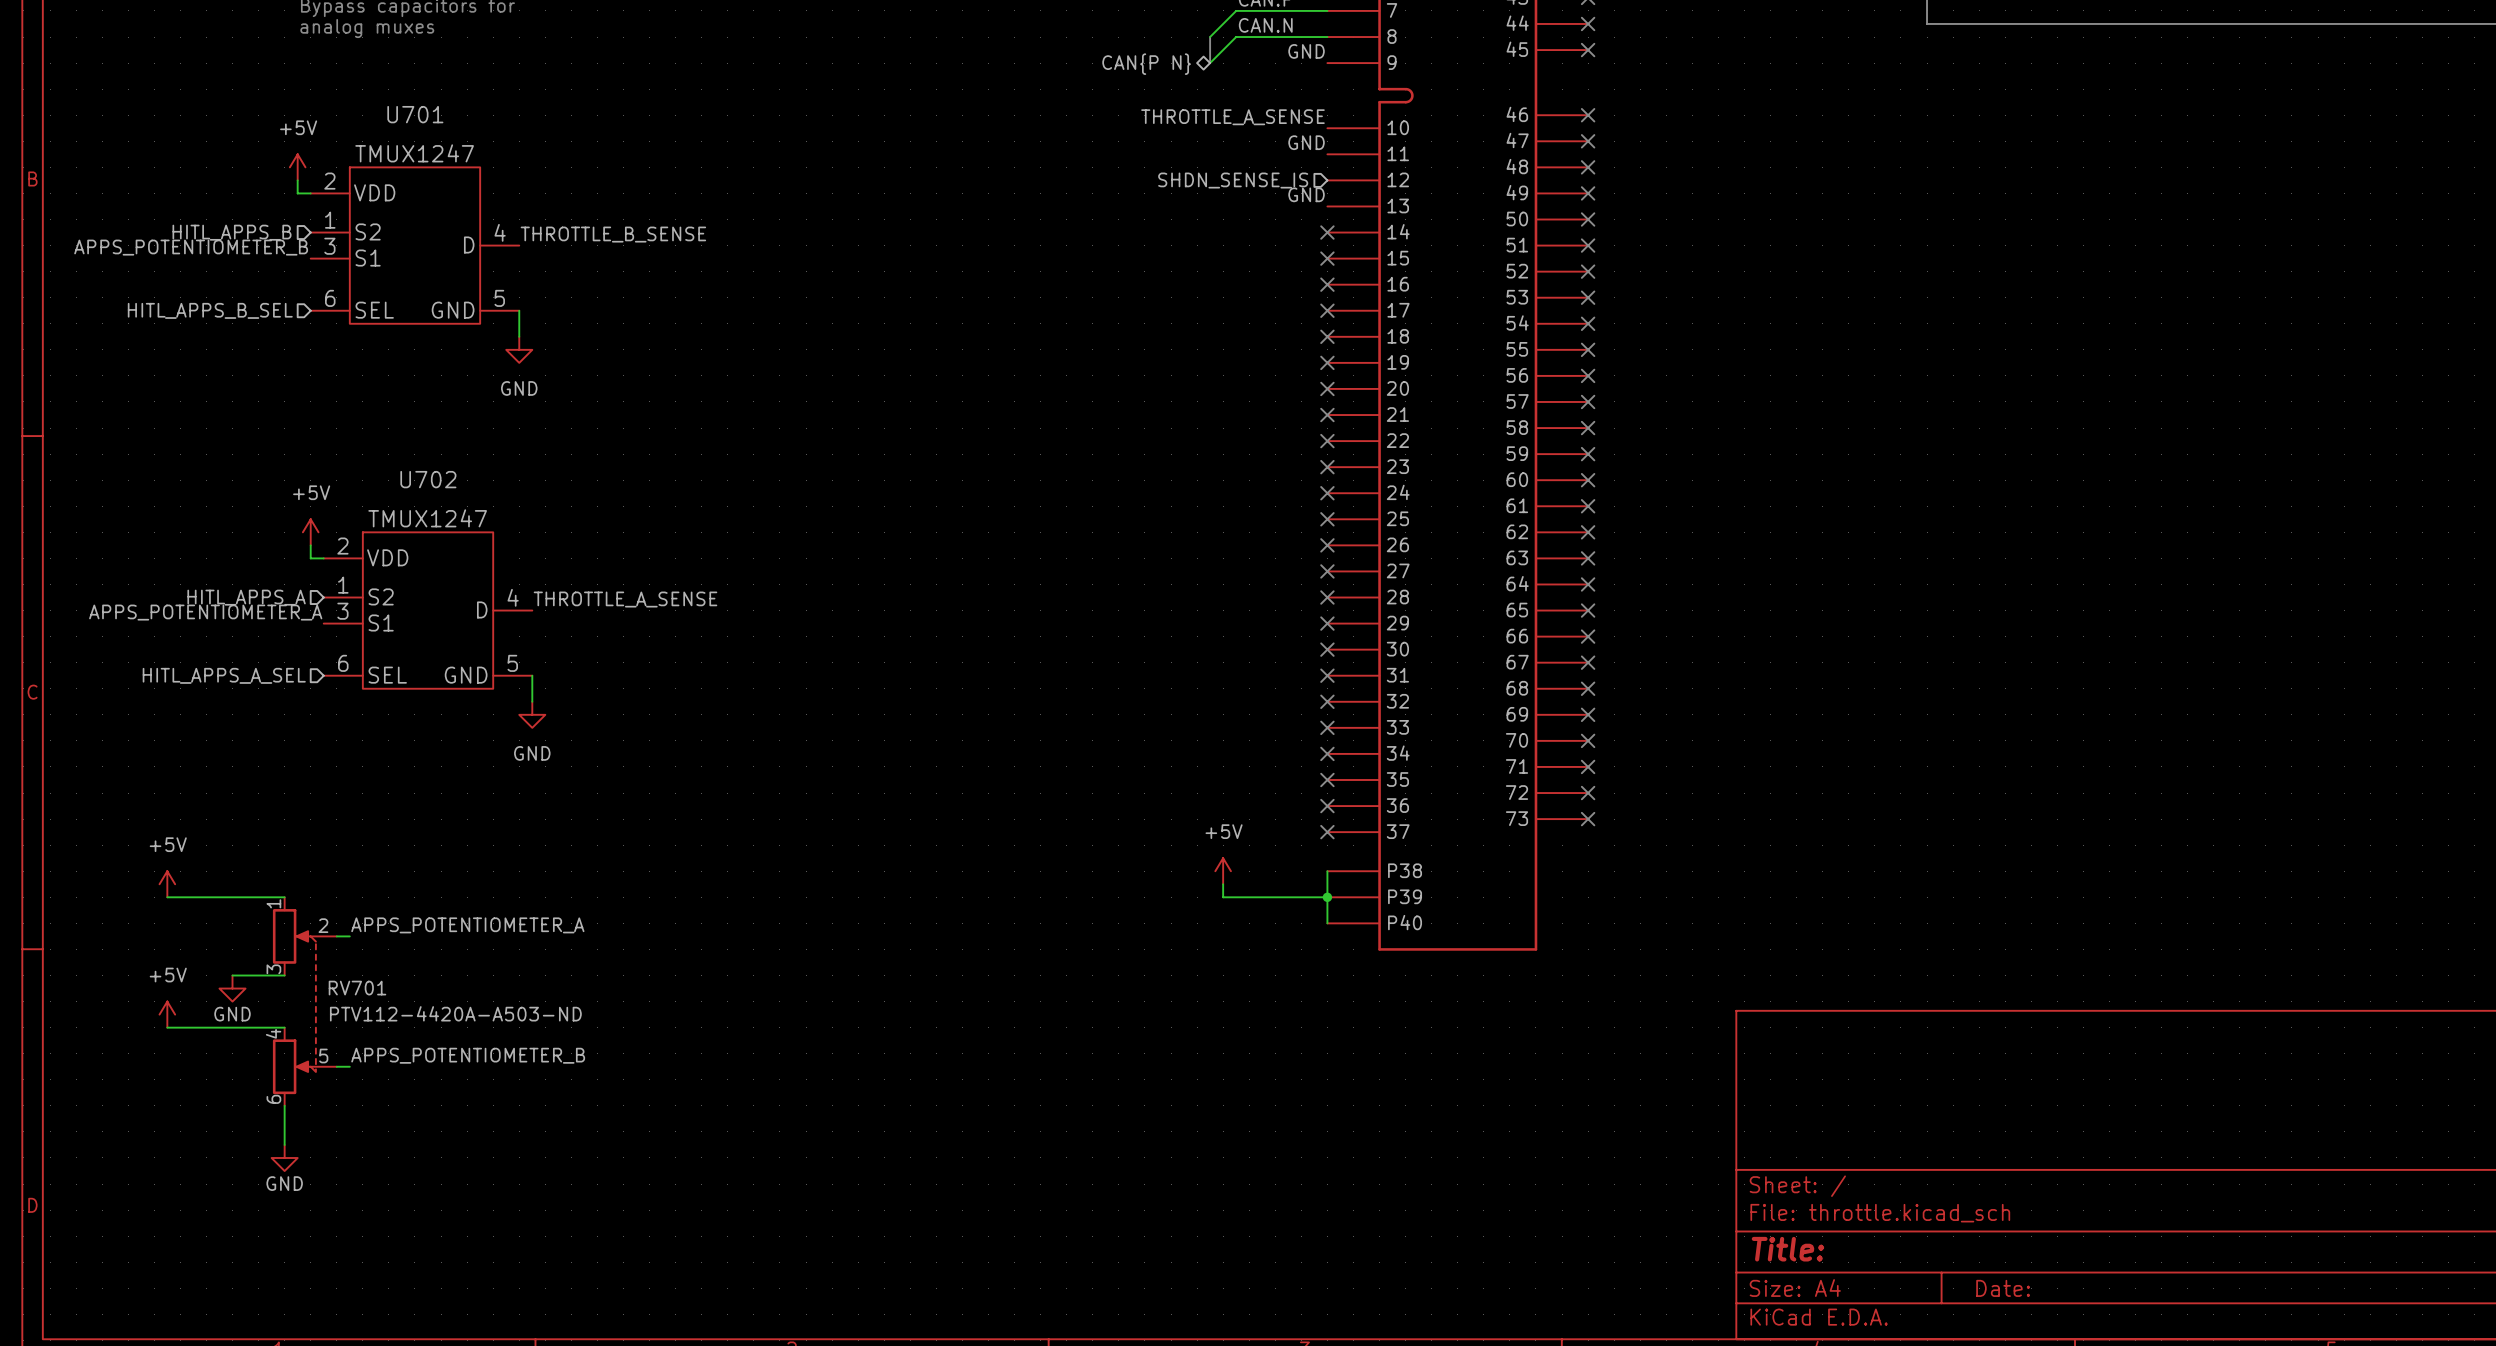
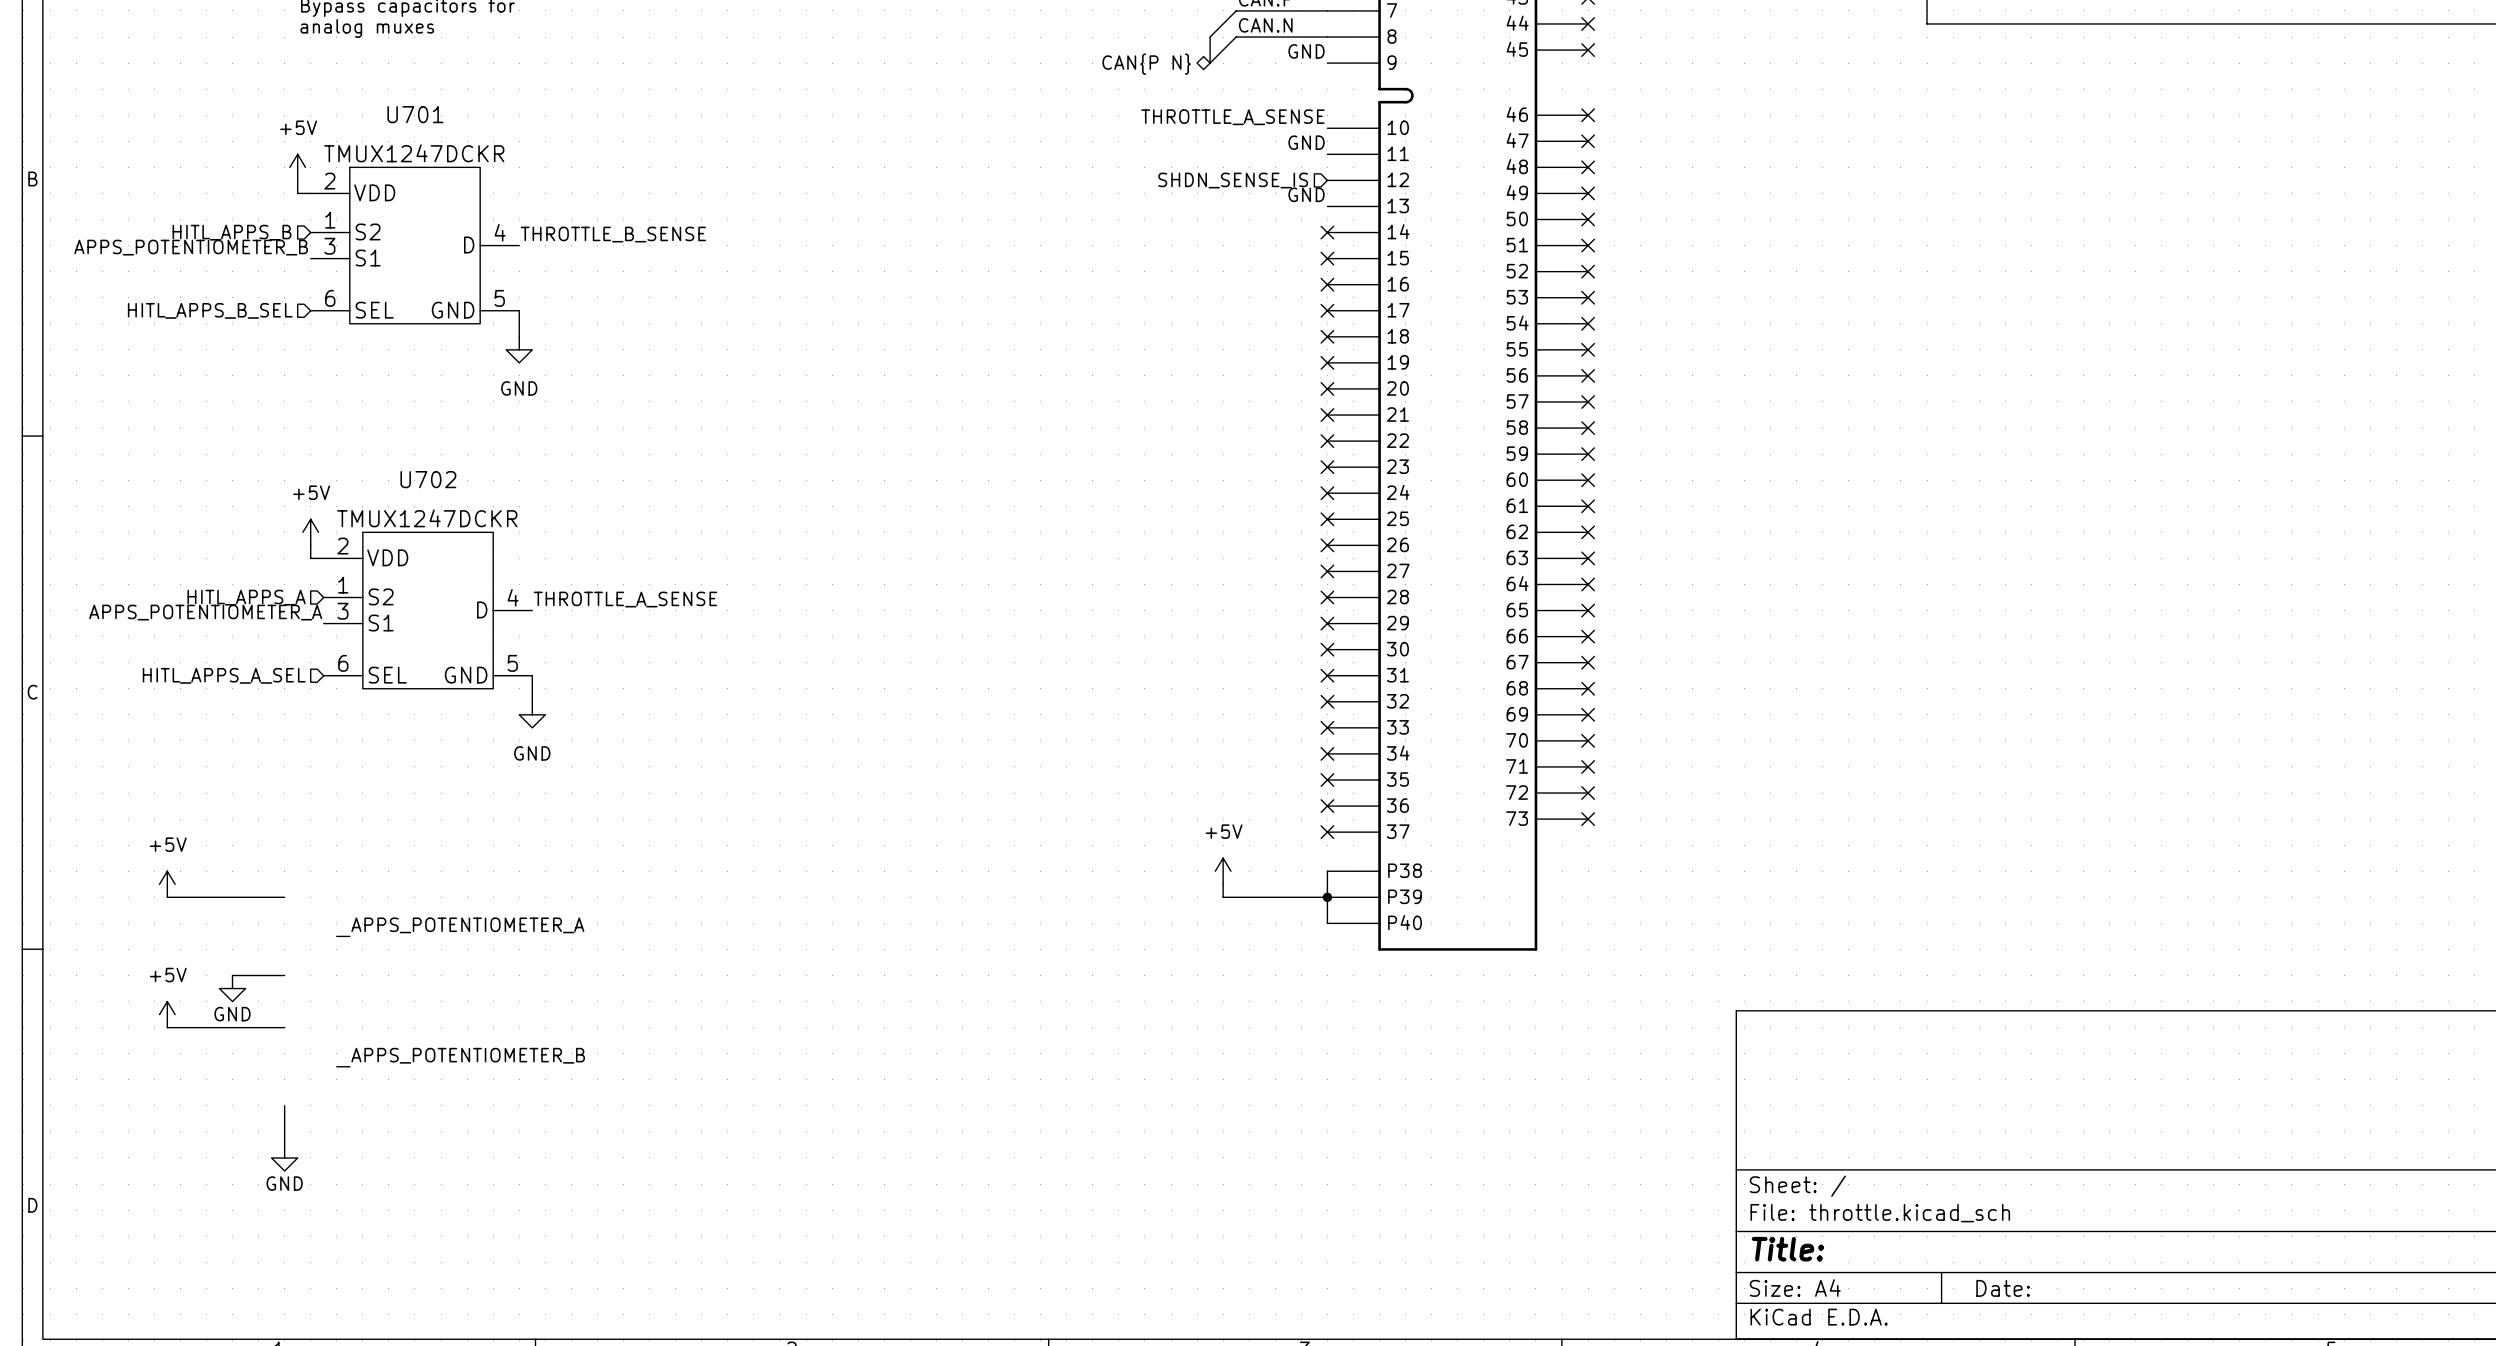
U701 value: TMUX1247 (414, 153) -> TMUX1247DCKR (414, 153)
U702 value: TMUX1247 (427, 518) -> TMUX1247DCKR (427, 518)
RV701: PTV112-4420A-A503-ND (304, 1001) -> none

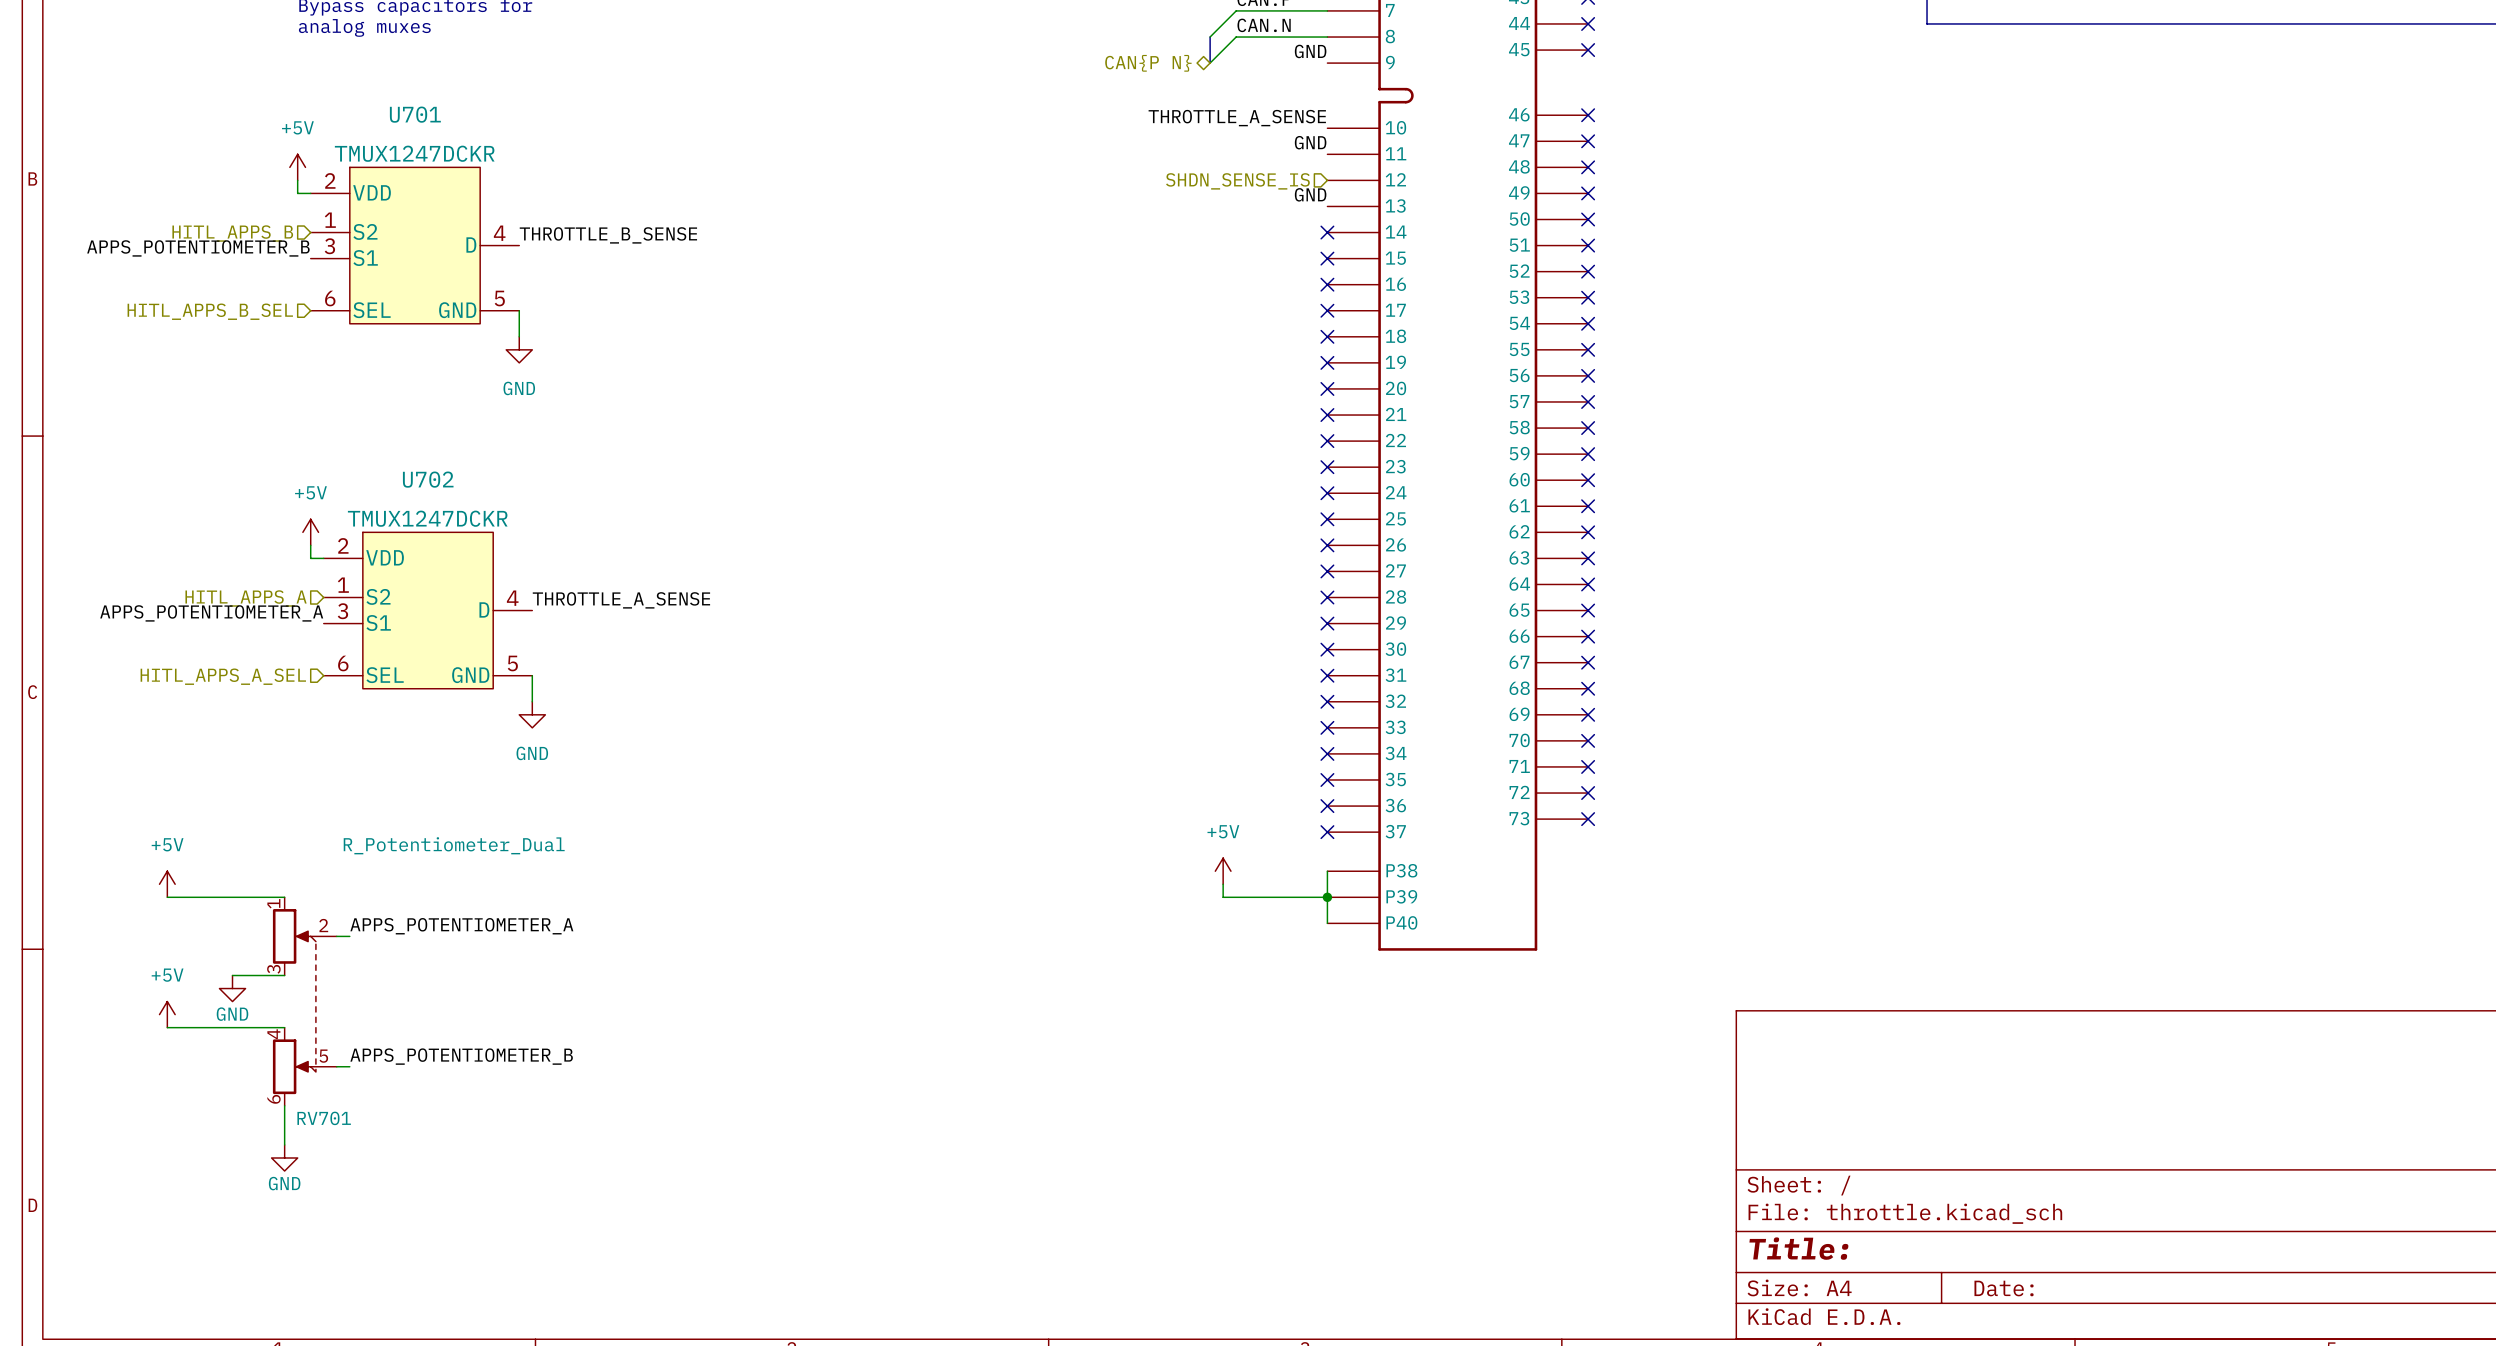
RV701: none -> R_Potentiometer_Dual (304, 1001)

